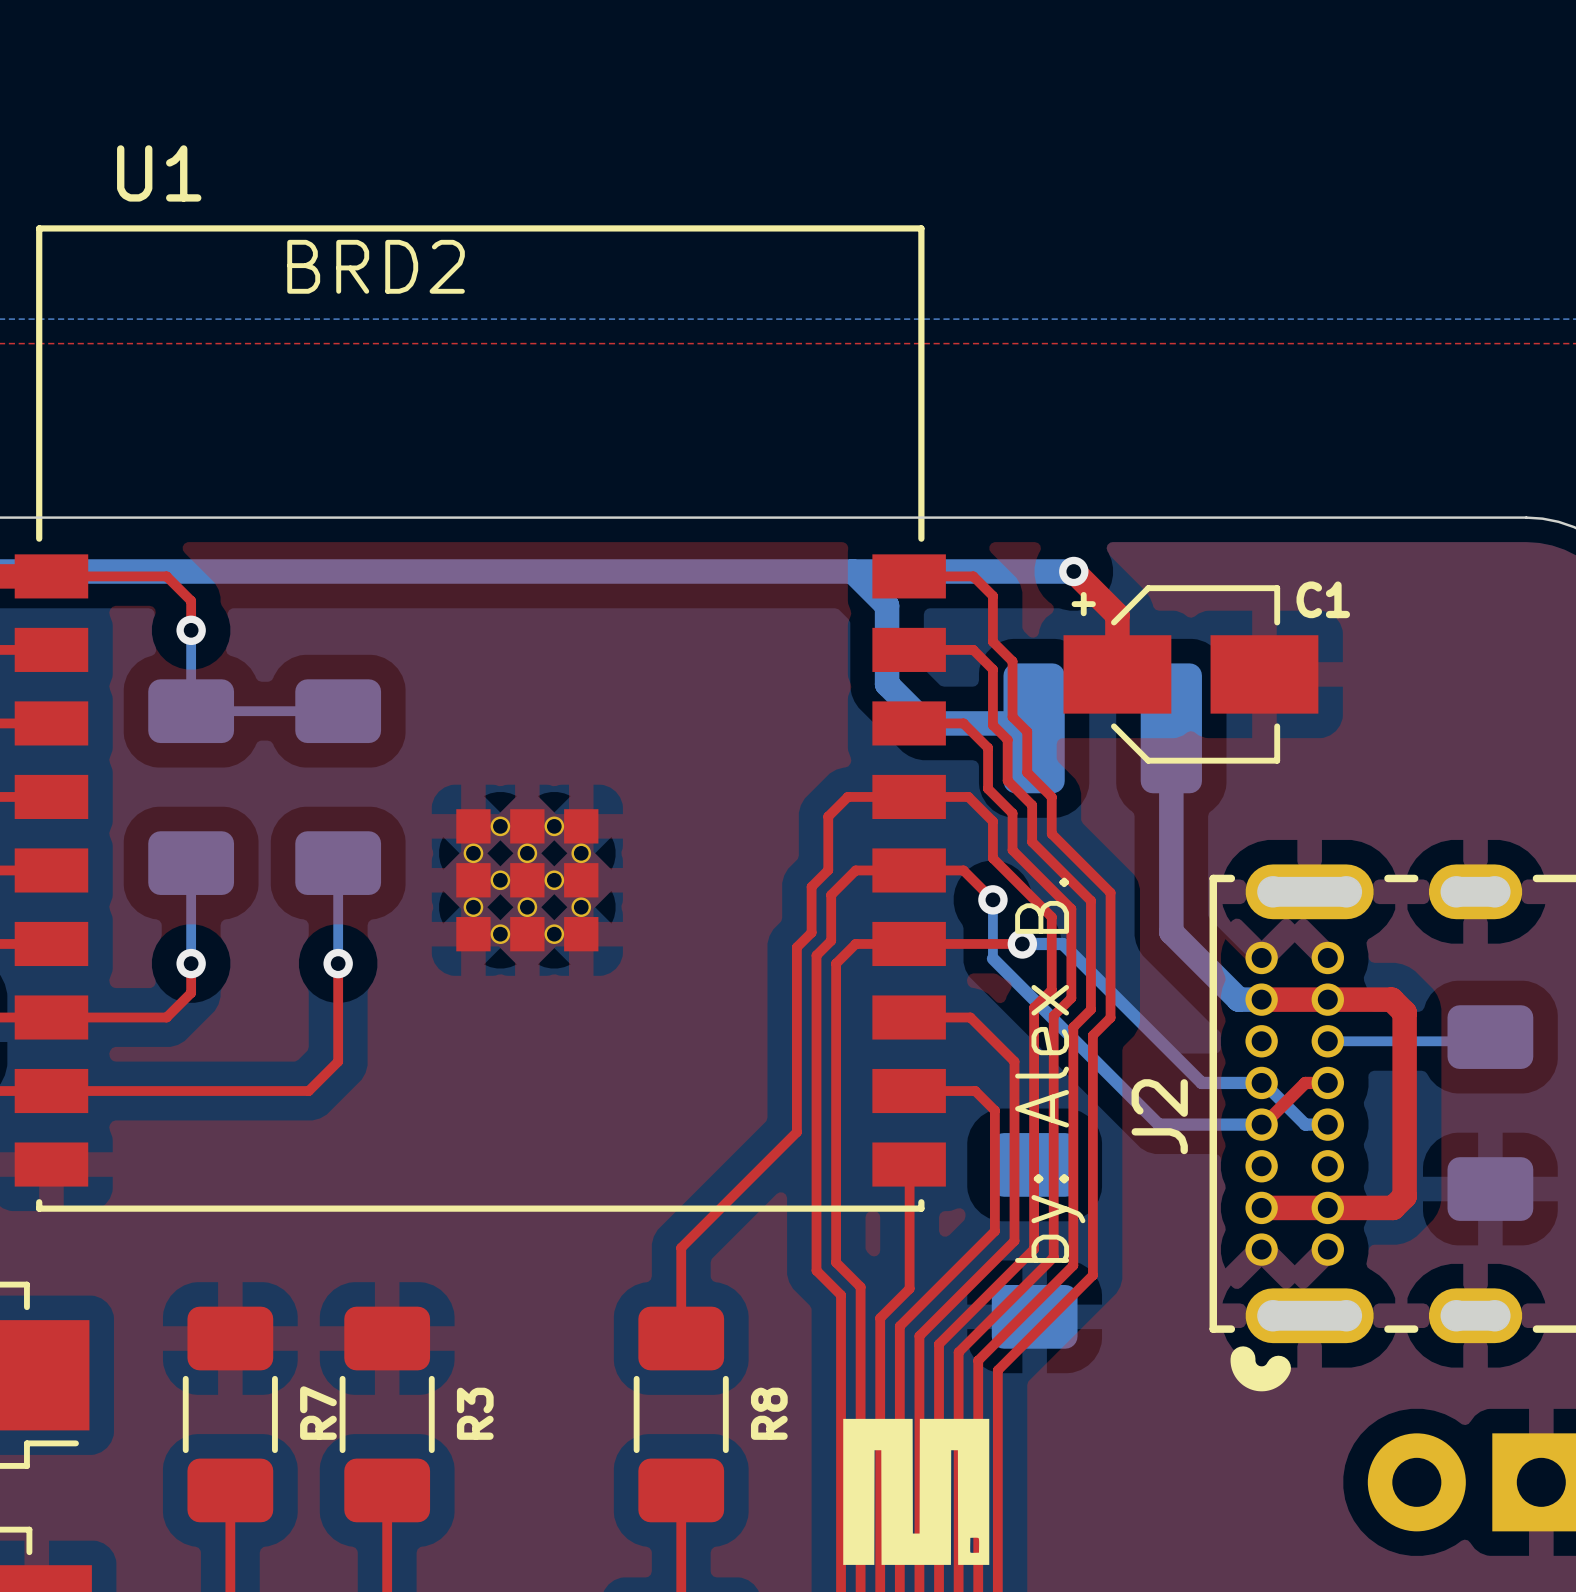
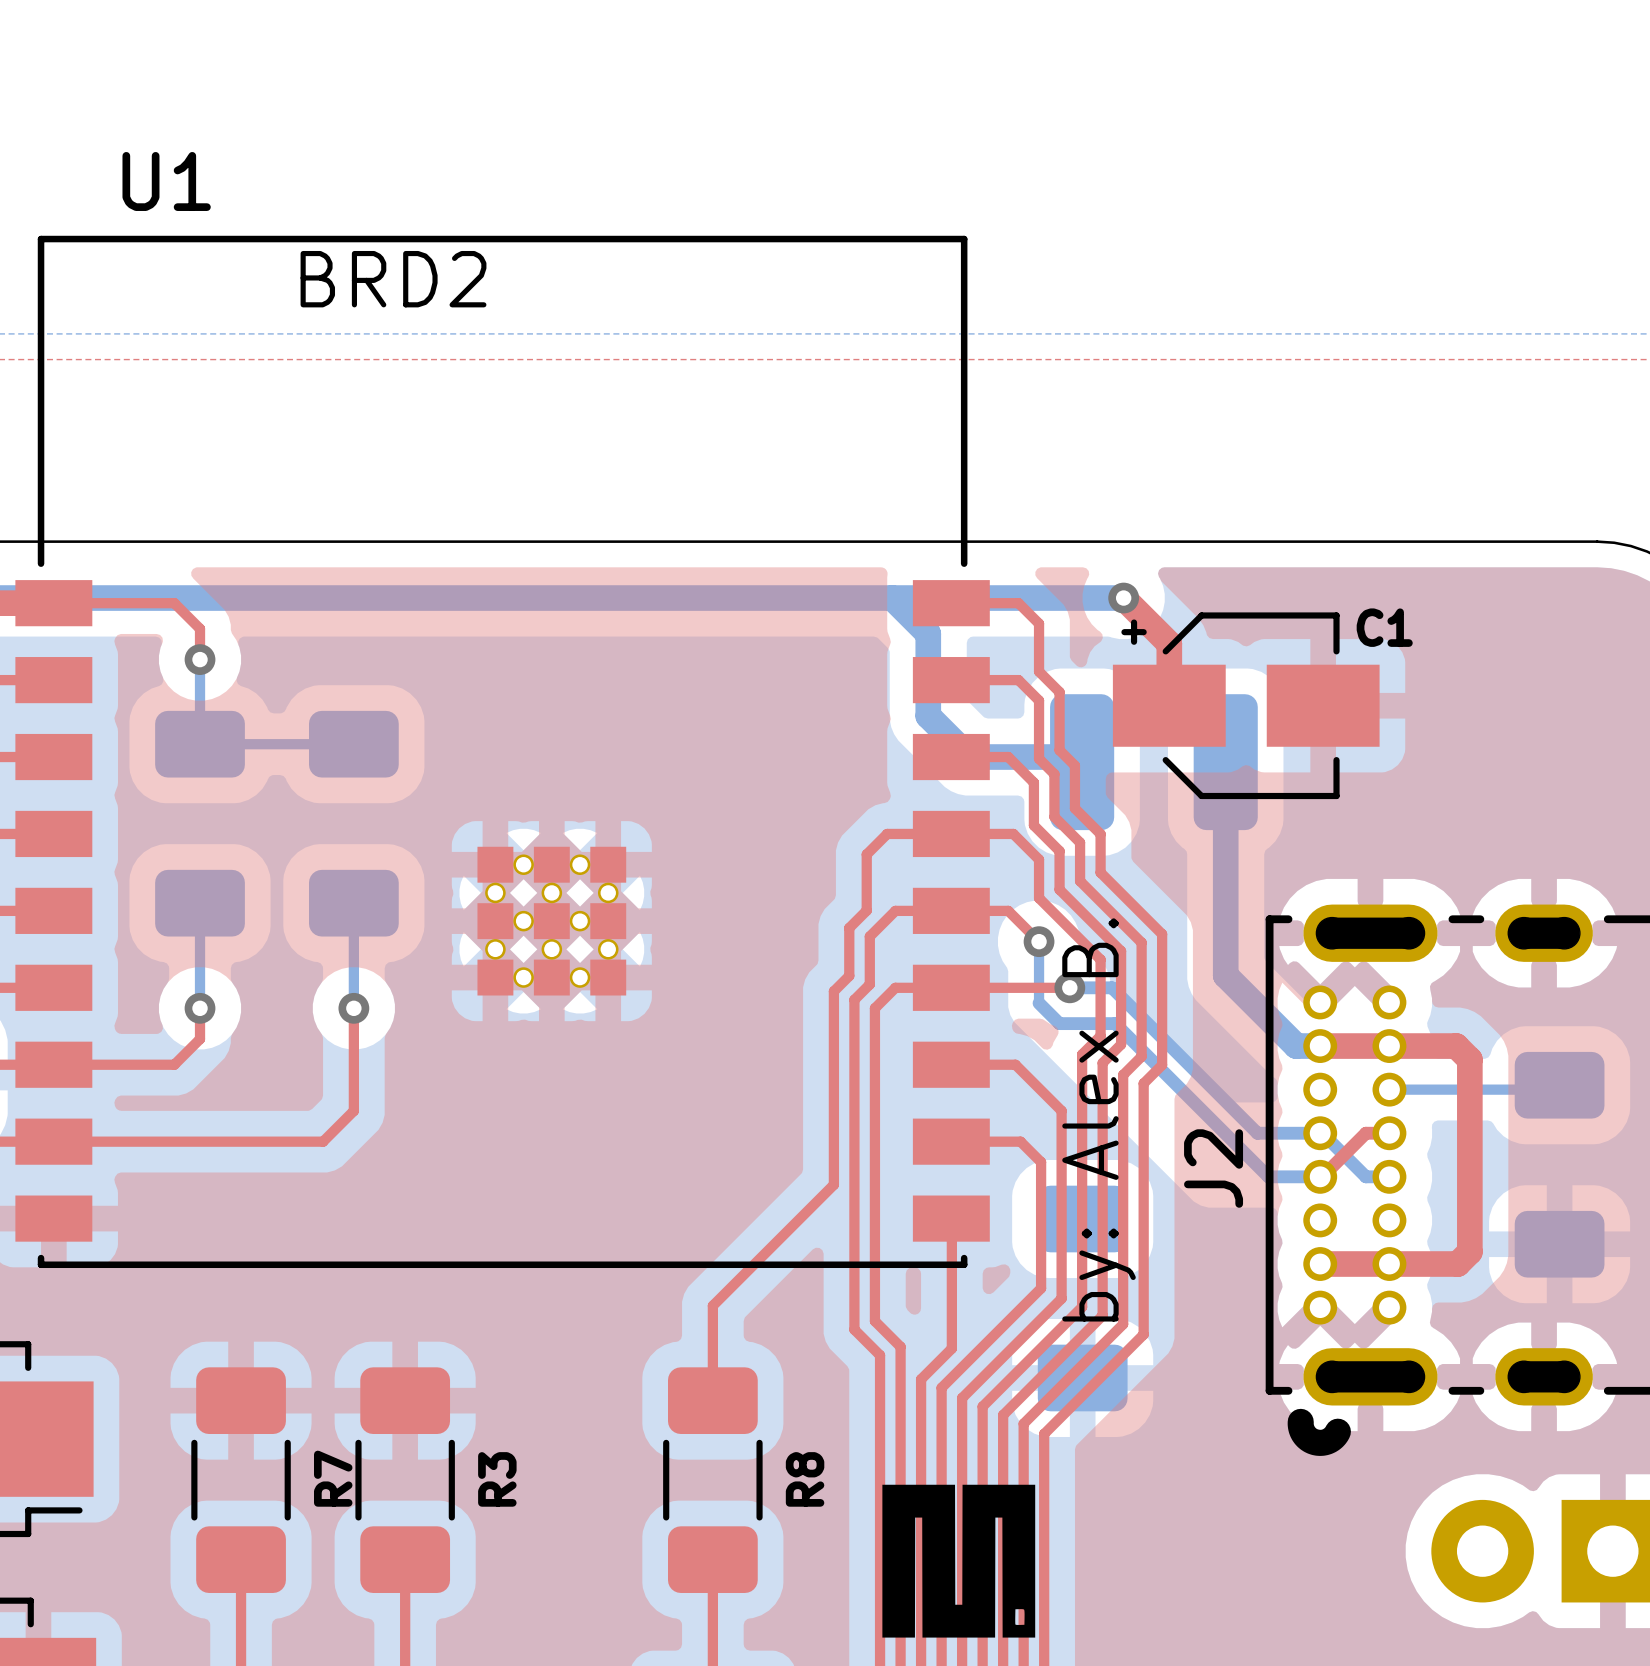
bottom track: (1012, 978) (1158, 1124) (1212, 1124) -> (1059, 1023) (1115, 1023) (1268, 1176)

